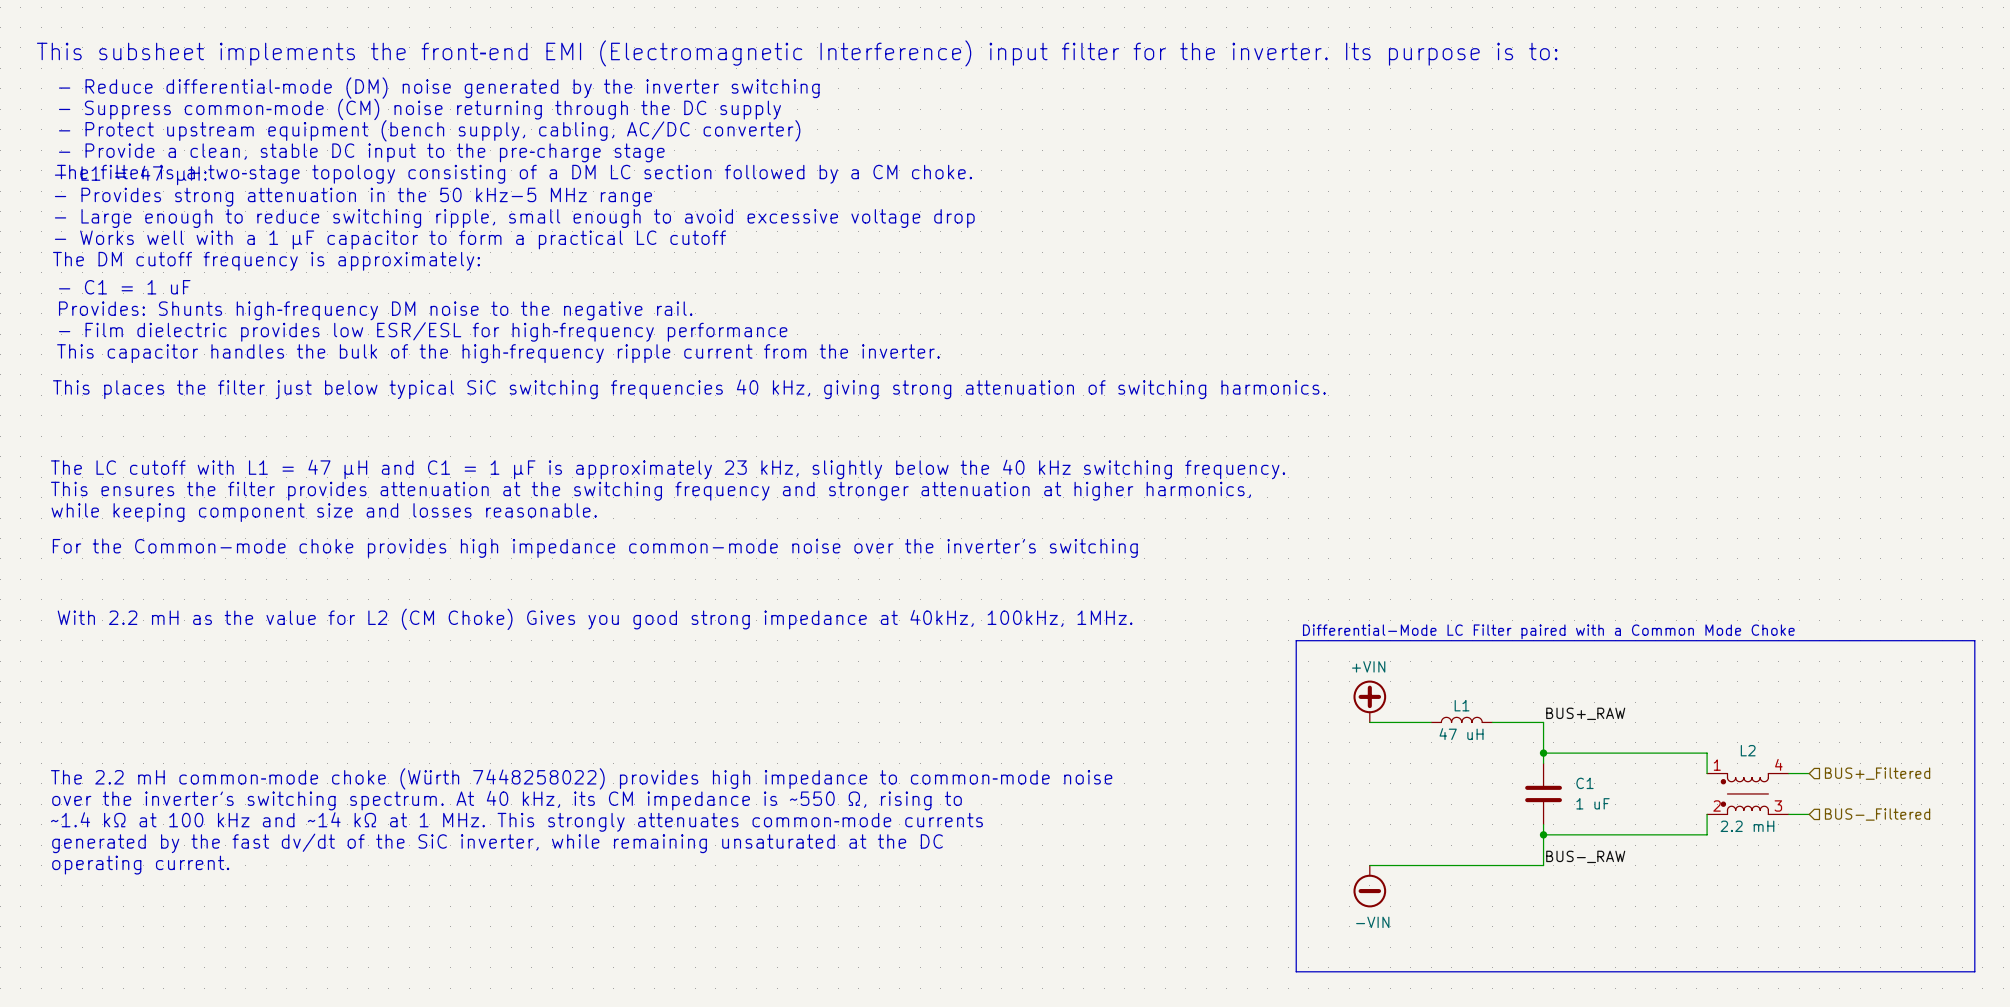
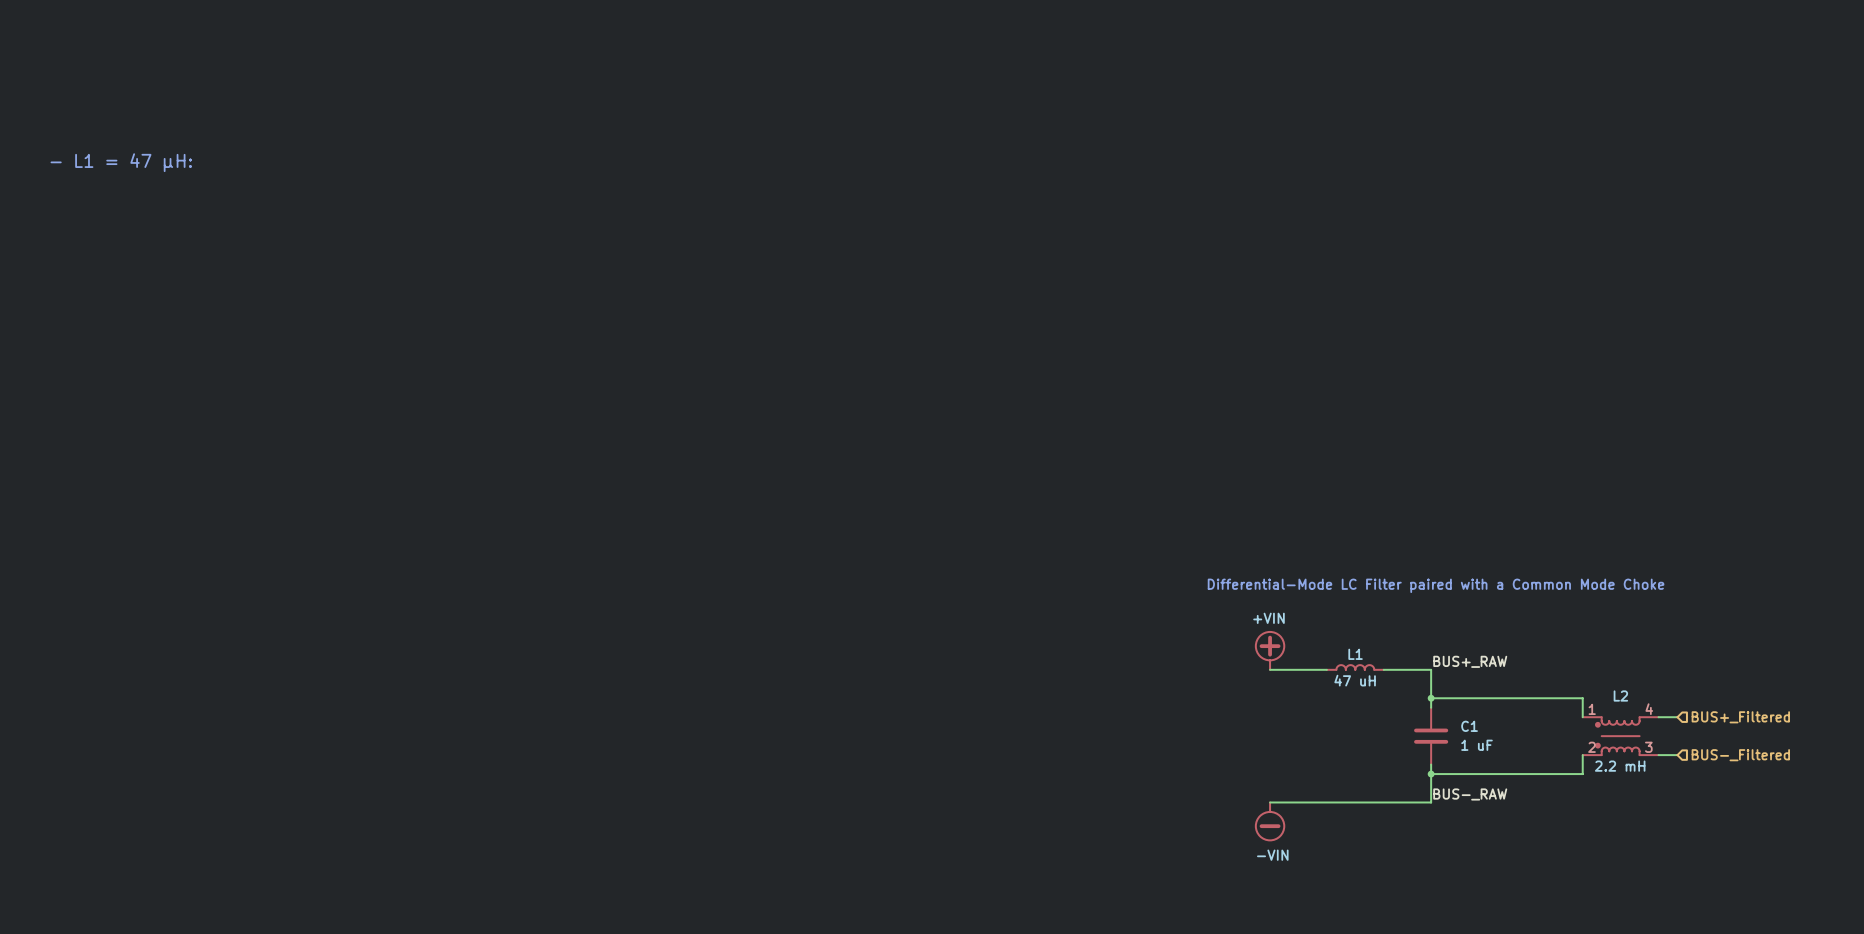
text: This subsheet implements the front‑end EMI (Electromagnetic Interference) input filter for the inverter. Its purpose is to: (797, 53) -> none
text: - Reduce differential‑mode (DM) noise generated by the inverter switching (439, 88) -> none
text: - Suppress common‑mode (CM) noise returning through the DC supply (419, 109) -> none
text: - Protect upstream equipment (bench supply, cabling, AC/DC converter) (429, 130) -> none
text: - Provide a clean, stable DC input to the pre‑charge stage (361, 152) -> none
text: The filter is a two‑stage topology consisting of a DM LC section followed by a CM choke. (514, 174) -> none
text: - Provides strong attenuation in the 50 kHz-5 MHz range (353, 197) -> none
text: - Large enough to reduce switching ripple, small enough to avoid excessive voltage drop (514, 218) -> none
text: - Works well with a 1 µF capacitor to form a practical LC cutoff (390, 239) -> none
text: The DM cutoff frequency is approximately: (266, 261) -> none
text: - C1 = 1 uF (124, 287) -> none
text: Provides: Shunts high‑frequency DM noise to the negative rail. (375, 310) -> none
text: - Film dielectric provides low ESR/ESL for high‑frequency performance (423, 331) -> none
text: This capacitor handles the bulk of the high‑frequency ripple current from the inverter. (498, 353) -> none
text: This places the filter just below typical SiC switching frequencies 40 kHz, giving strong attenuation of switching harmonics. (689, 389) -> none
text: The LC cutoff with L1 = 47 µH and C1 = 1 µF is approximately 23 kHz, slightly below the 40 kHz switching frequency. (668, 469) -> none
text: This ensures the filter provides attenuation at the switching frequency and stronger attenuation at higher harmonics, (650, 491) -> none
text: while keeping component size and losses reasonable. (324, 512) -> none
text: For the Common-mode choke provides high impedance common-mode noise over the inverter's switching (595, 548) -> none
text: With 2.2 mH as the value for L2 (CM Choke) Gives you good strong impedance at 40kHz, 100kHz, 1MHz. (595, 619) -> none
line: (1296, 640) (1974, 640) (1974, 971) (1296, 971) (1296, 640) -> none
text: The 2.2 mH common‑mode choke (Würth 7448258022) provides high impedance to common‑mode noise (581, 778) -> none
text: over the inverter's switching spectrum. At 40 kHz, its CM impedance is ~550 Ω, rising to (507, 800) -> none
text: ~1.4 kΩ at 100 kHz and ~14 kΩ at 1 MHz. This strongly attenuates common‑mode currents (516, 821) -> none
text: generated by the fast dv/dt of the SiC inverter, while remaining unsaturated at the DC (497, 843) -> none
text: operating current. (140, 865) -> none

